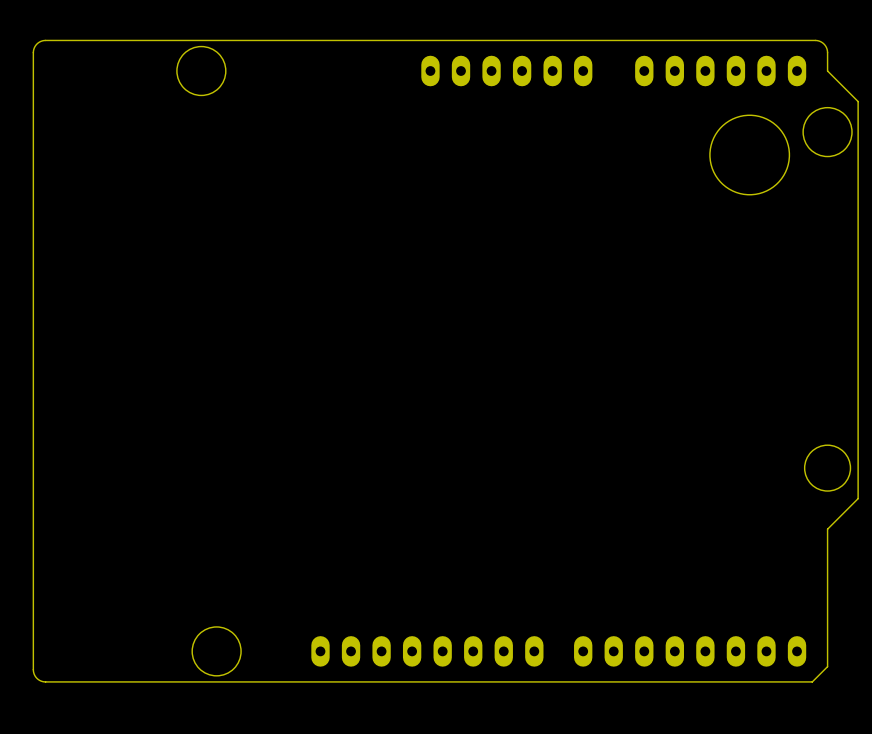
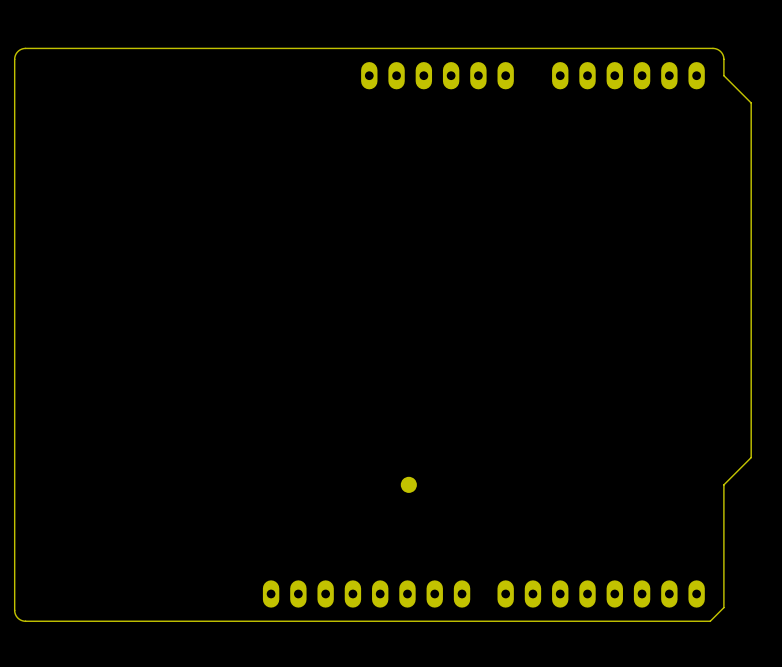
round board edge: [176, 45, 227, 97] -> none
round board edge: [802, 107, 853, 158] -> none
round board edge: [709, 114, 791, 196] -> none
round board edge: [804, 444, 852, 492] -> none
part: none -> (408, 484)
round board edge: [191, 626, 242, 677] -> none

